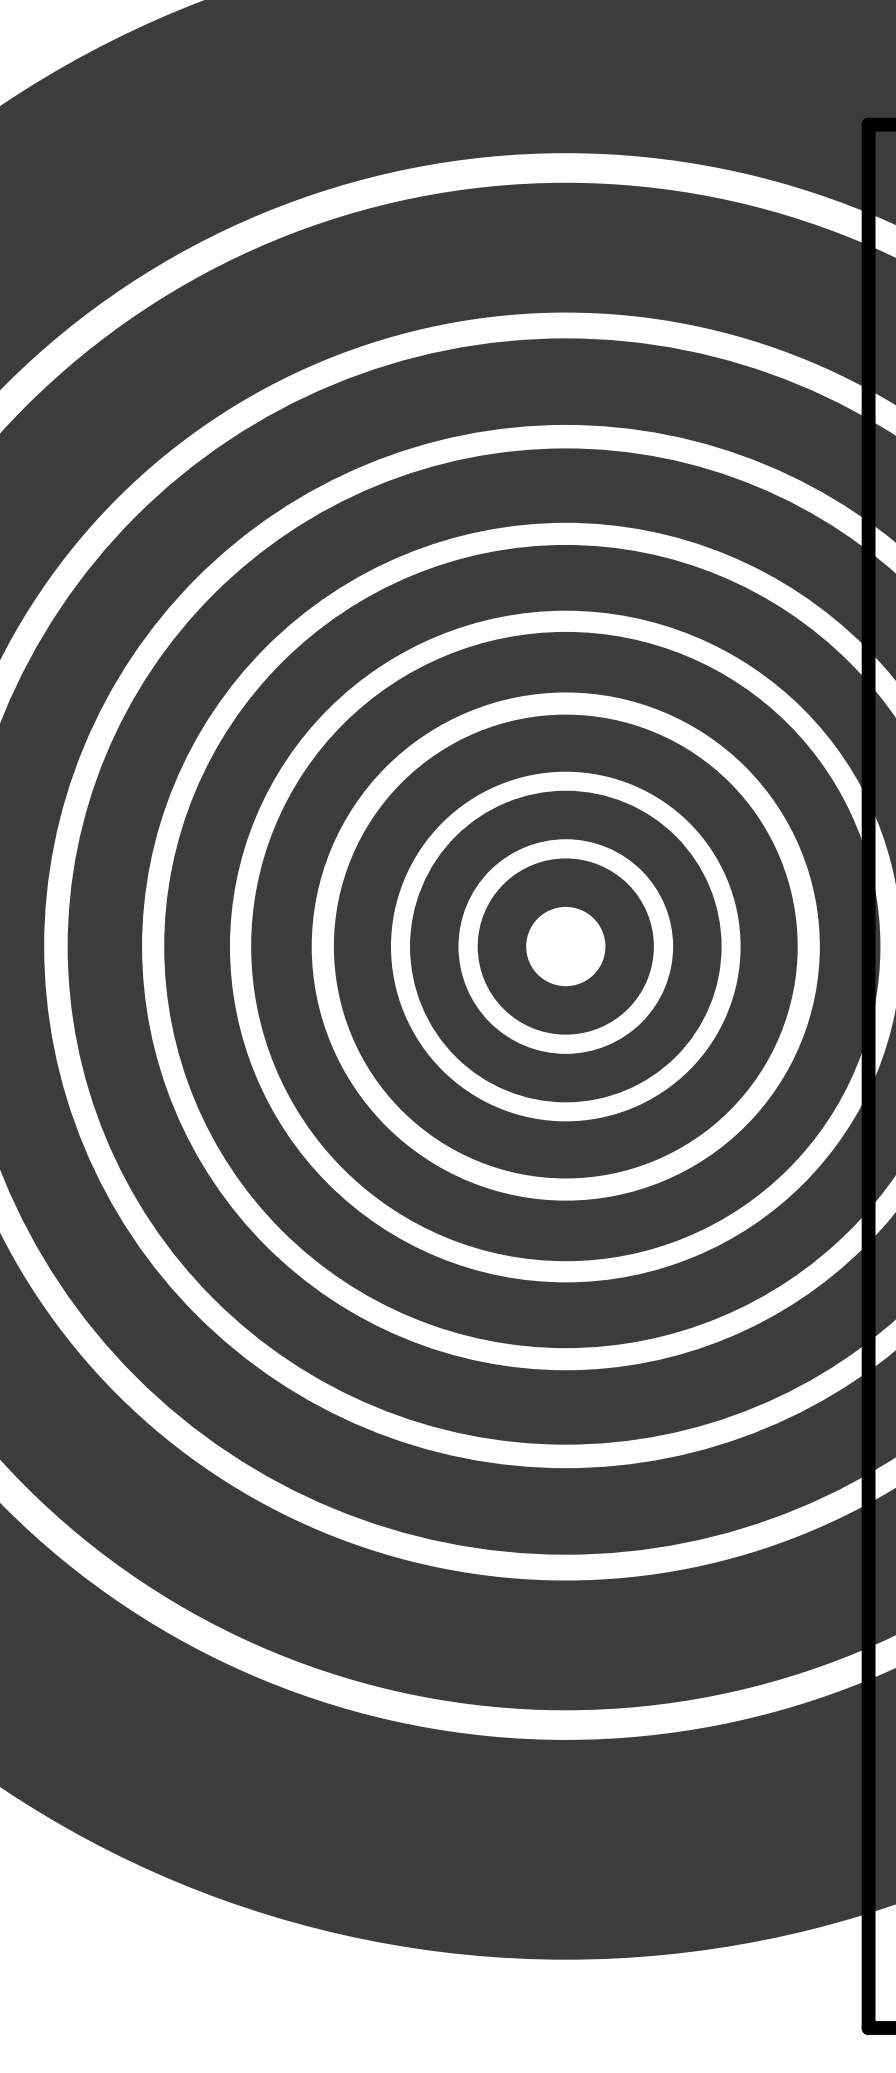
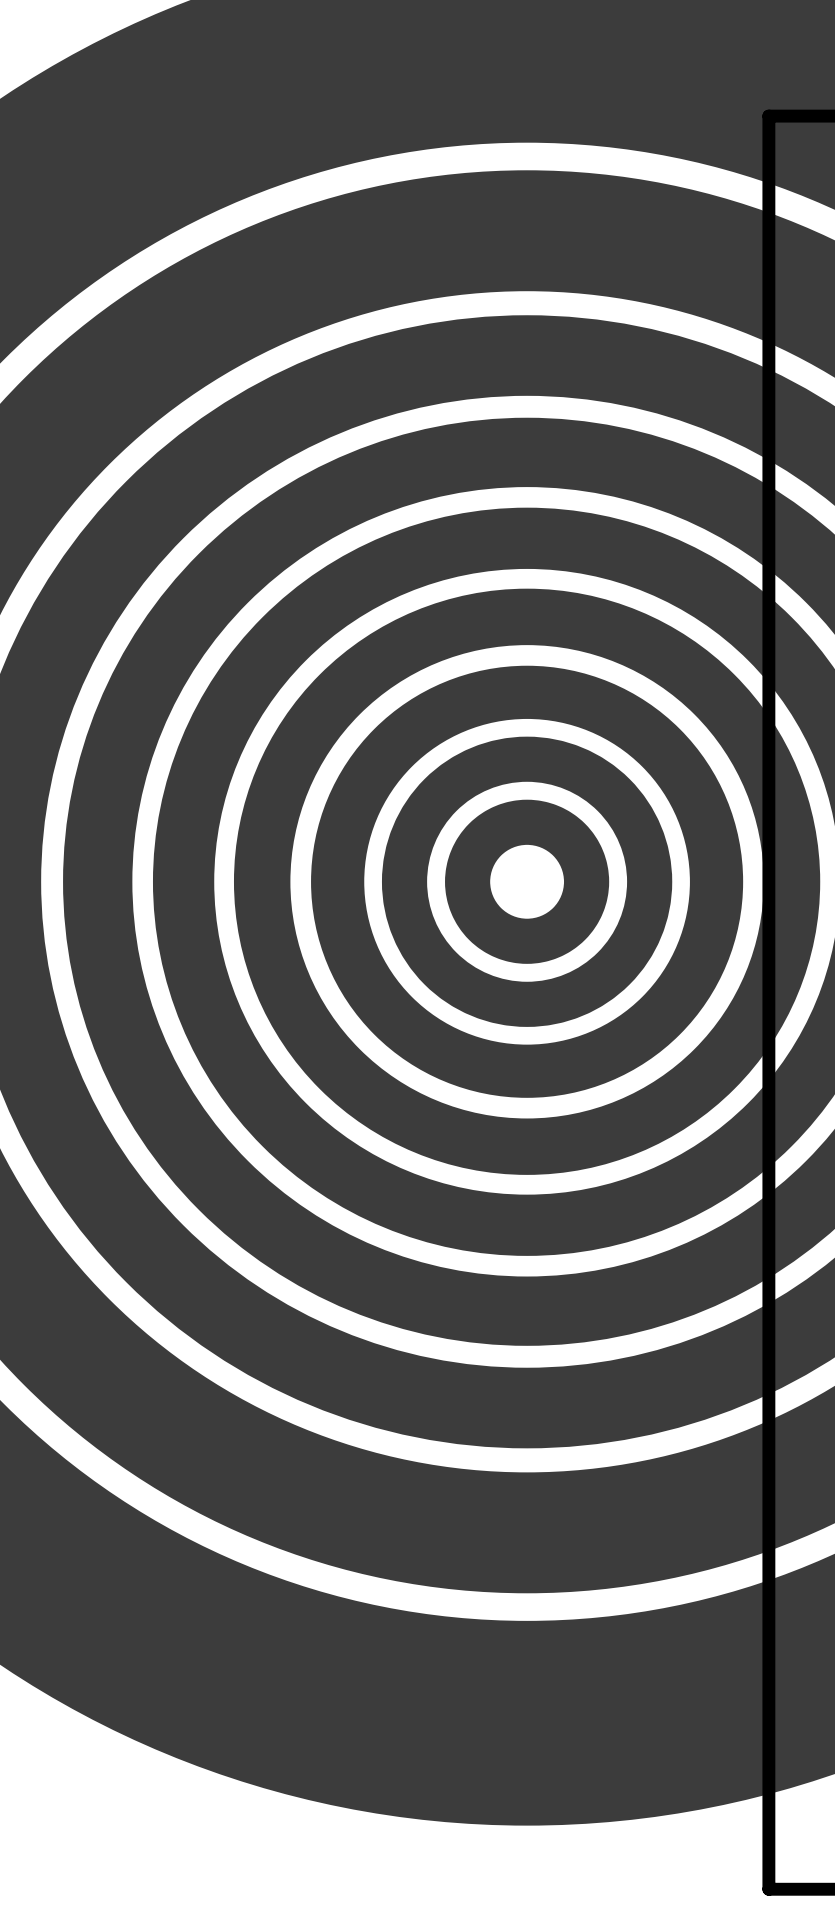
board edge: (868, 124) (868, 2028) -> (809, 116) (768, 116) (768, 1889) (809, 1889)

